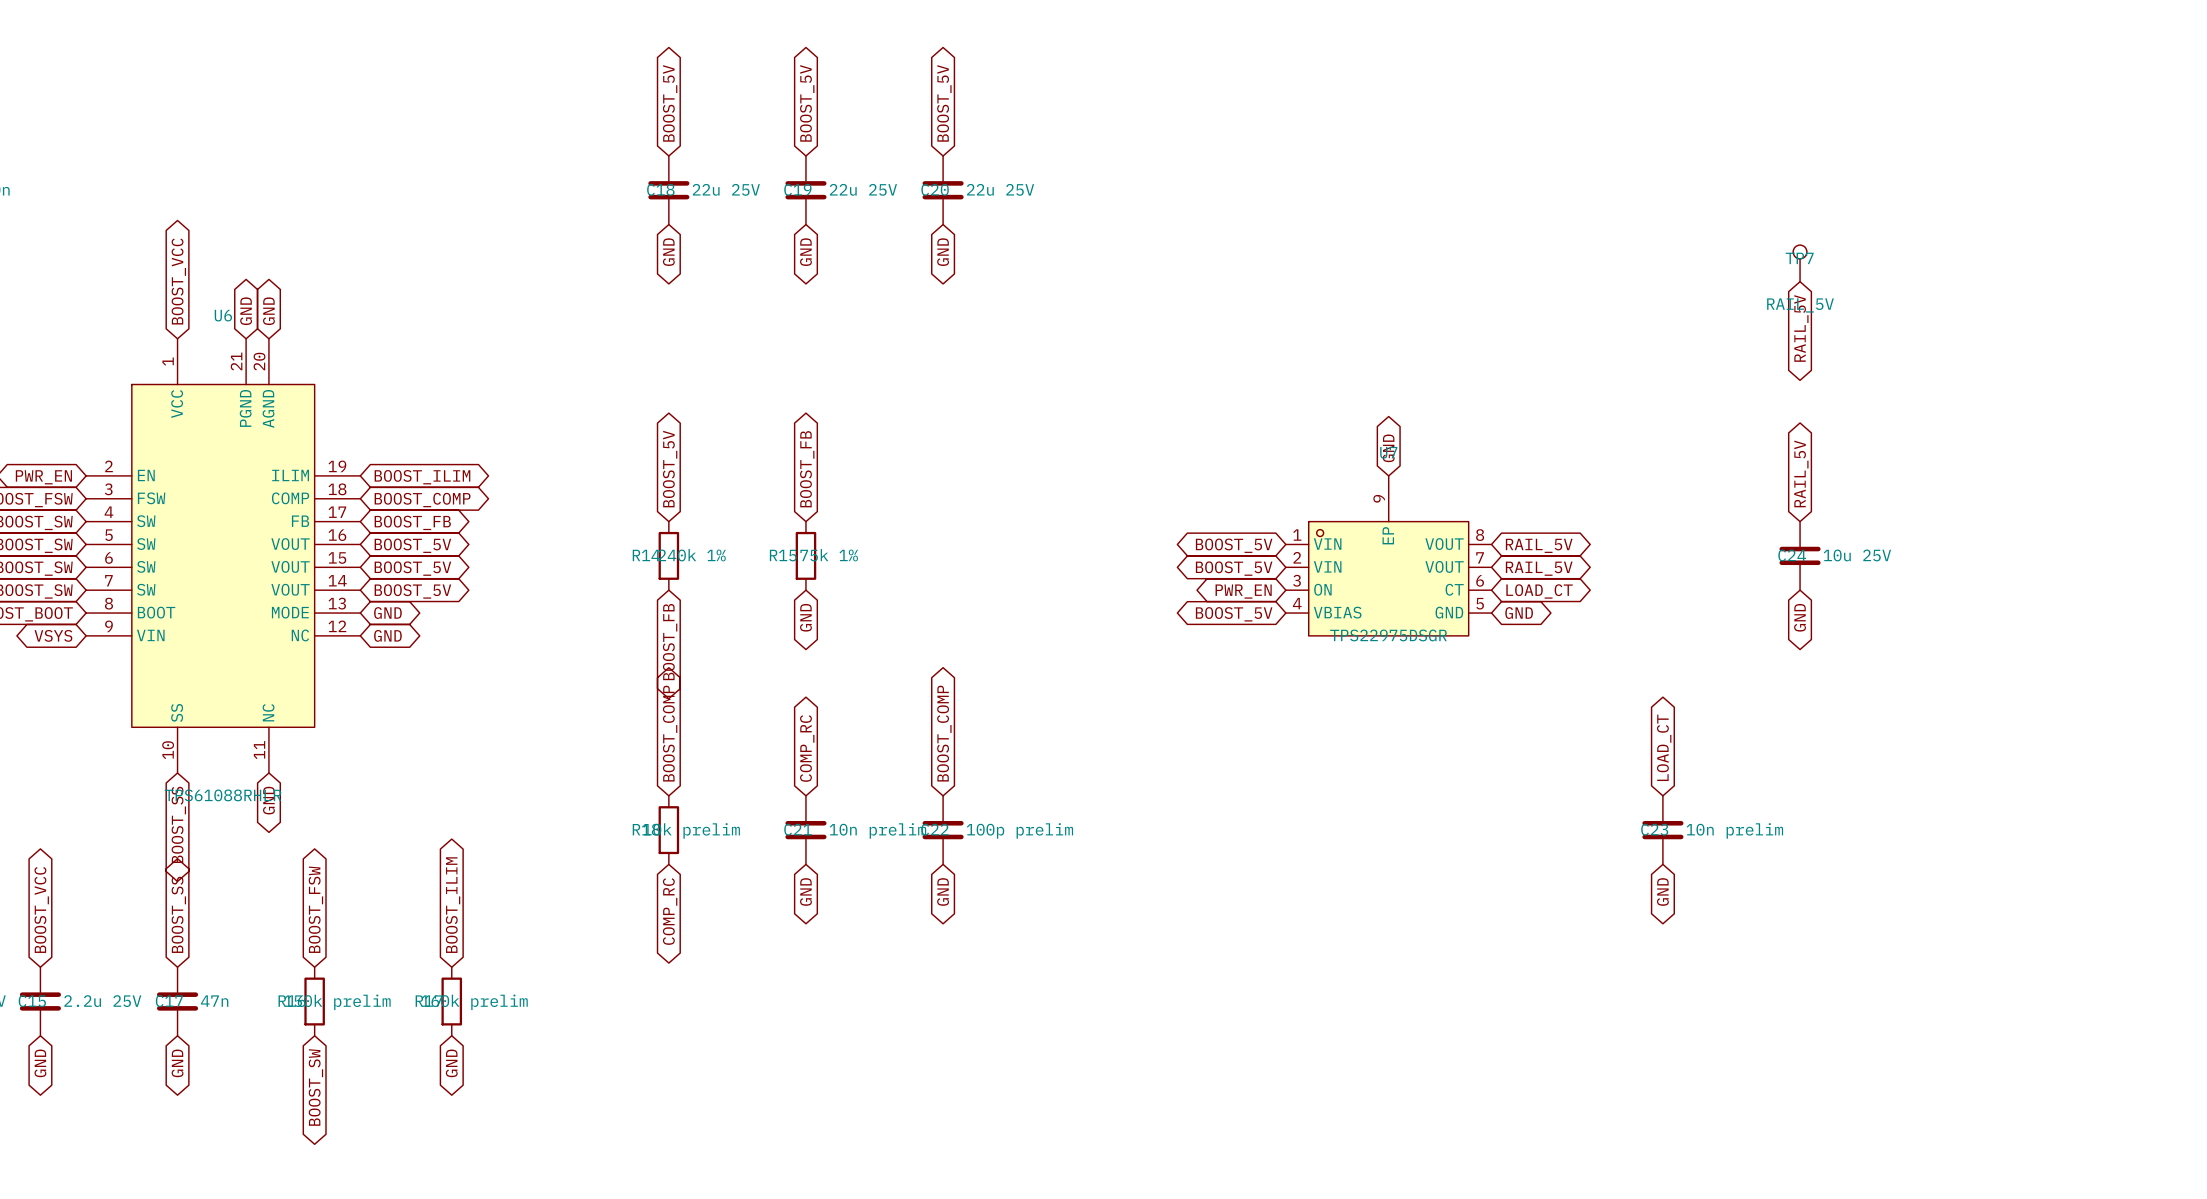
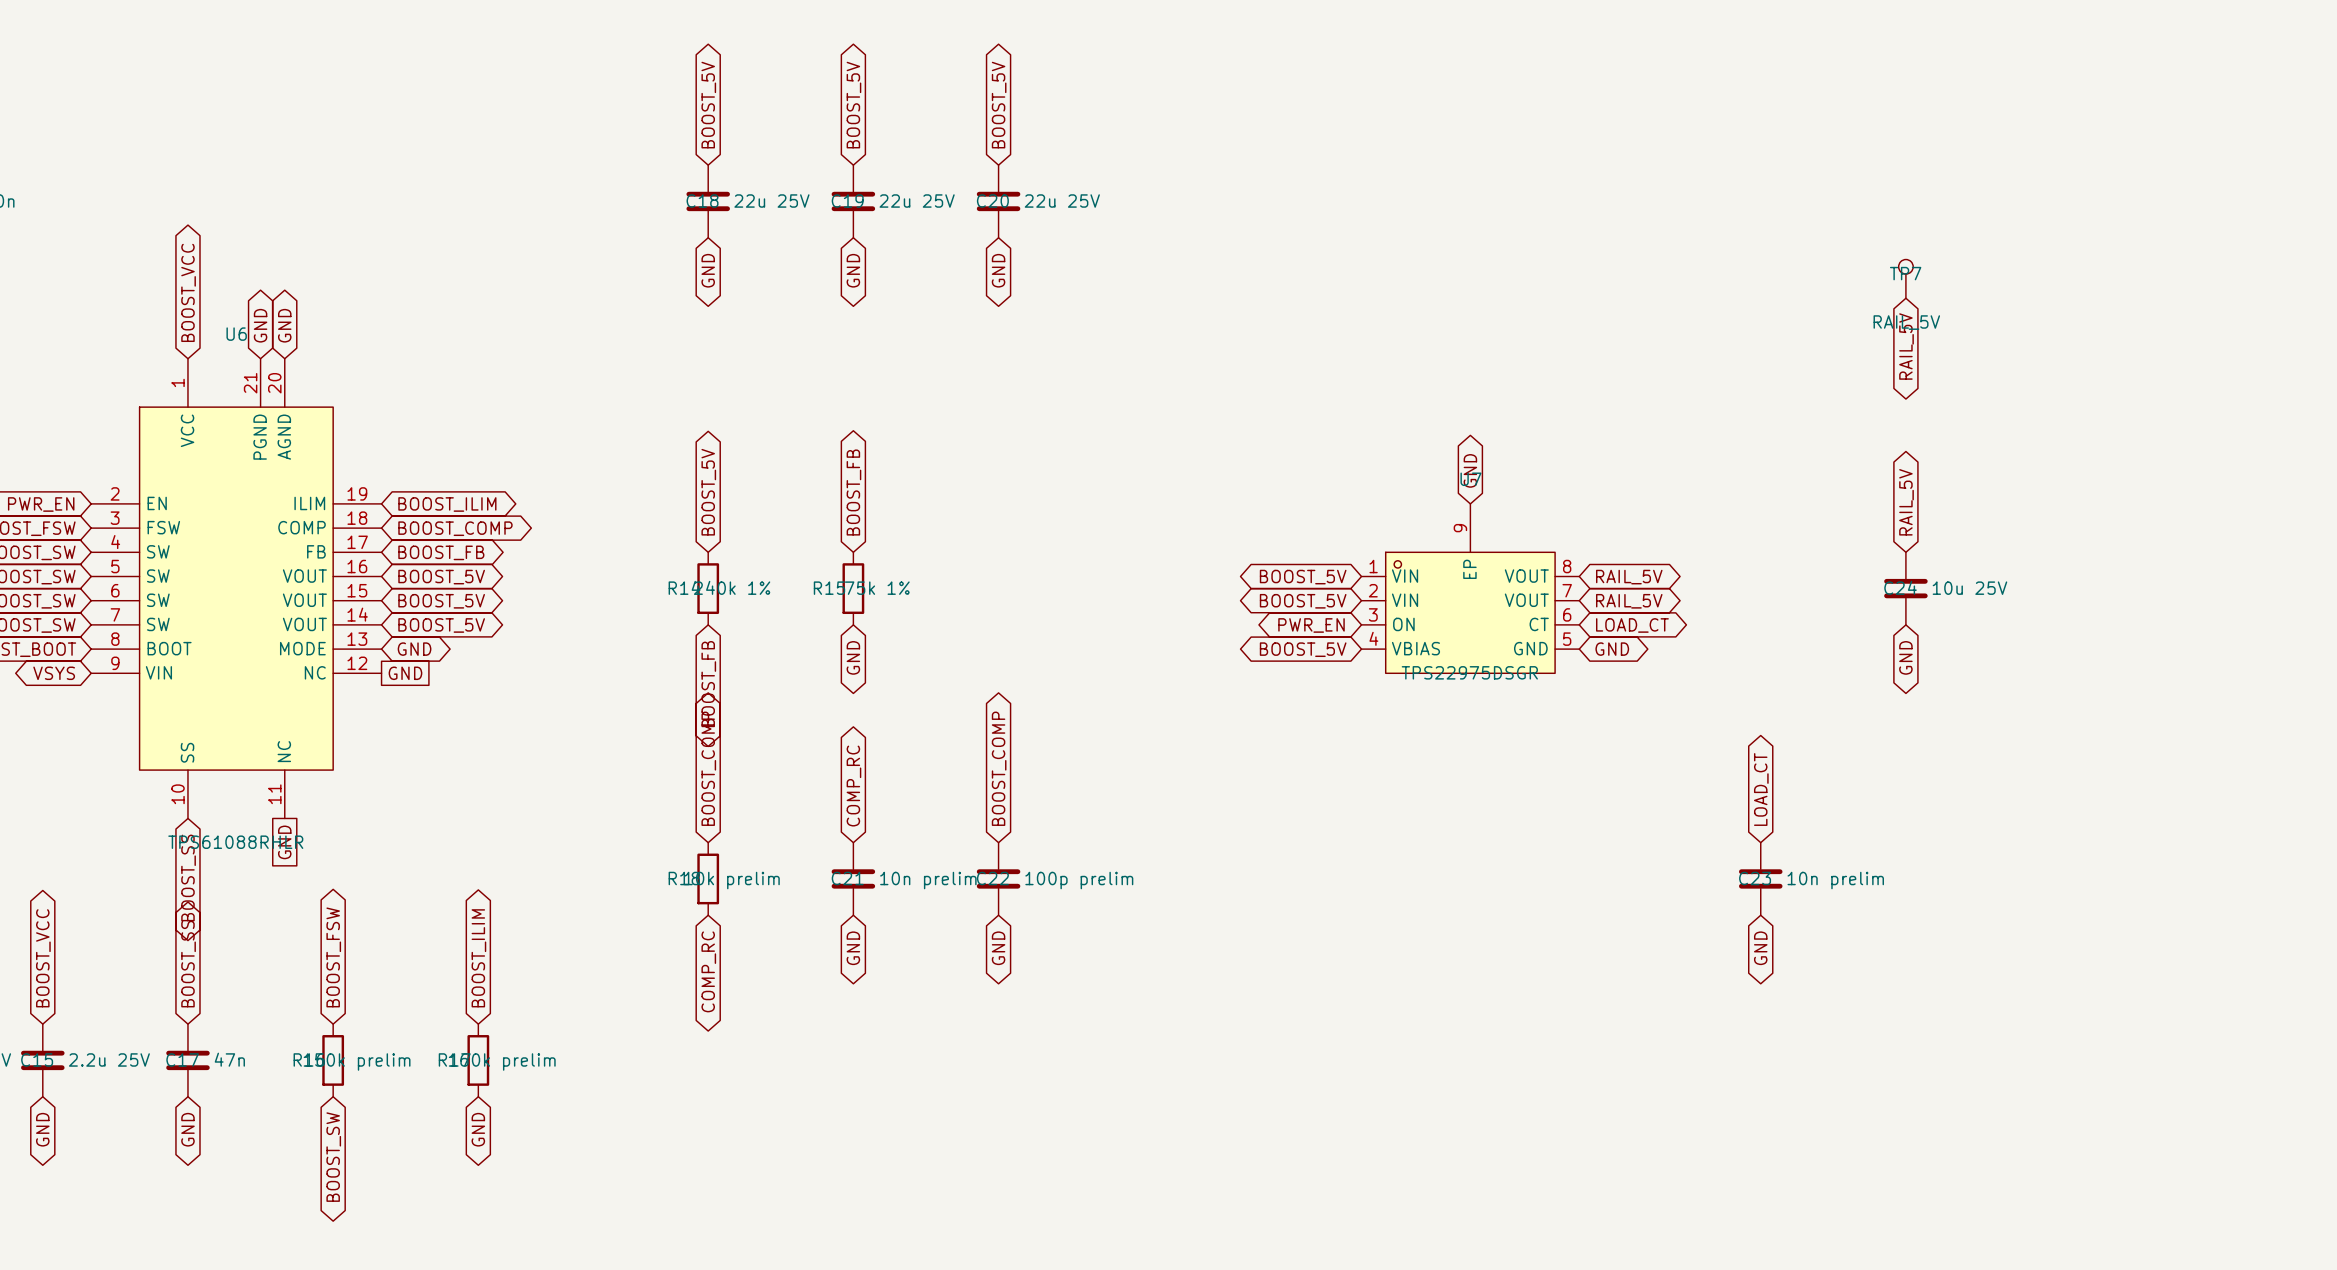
global label shape: bidirectional (387, 635) -> passive (405, 673)
global label shape: bidirectional (268, 800) -> passive (284, 842)

